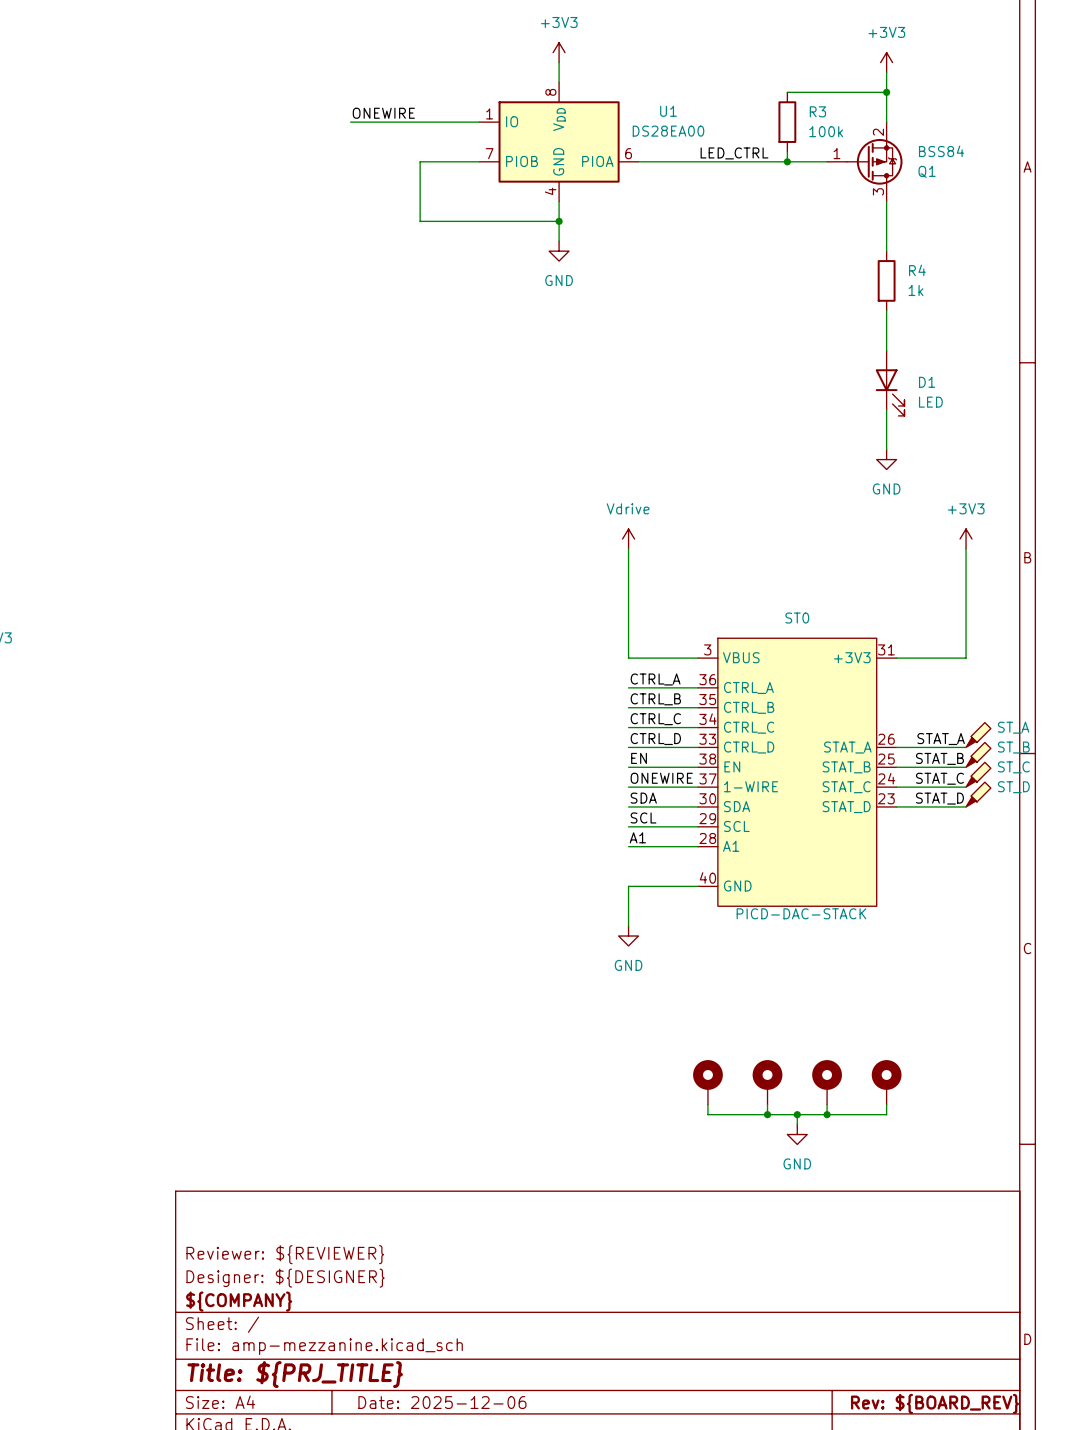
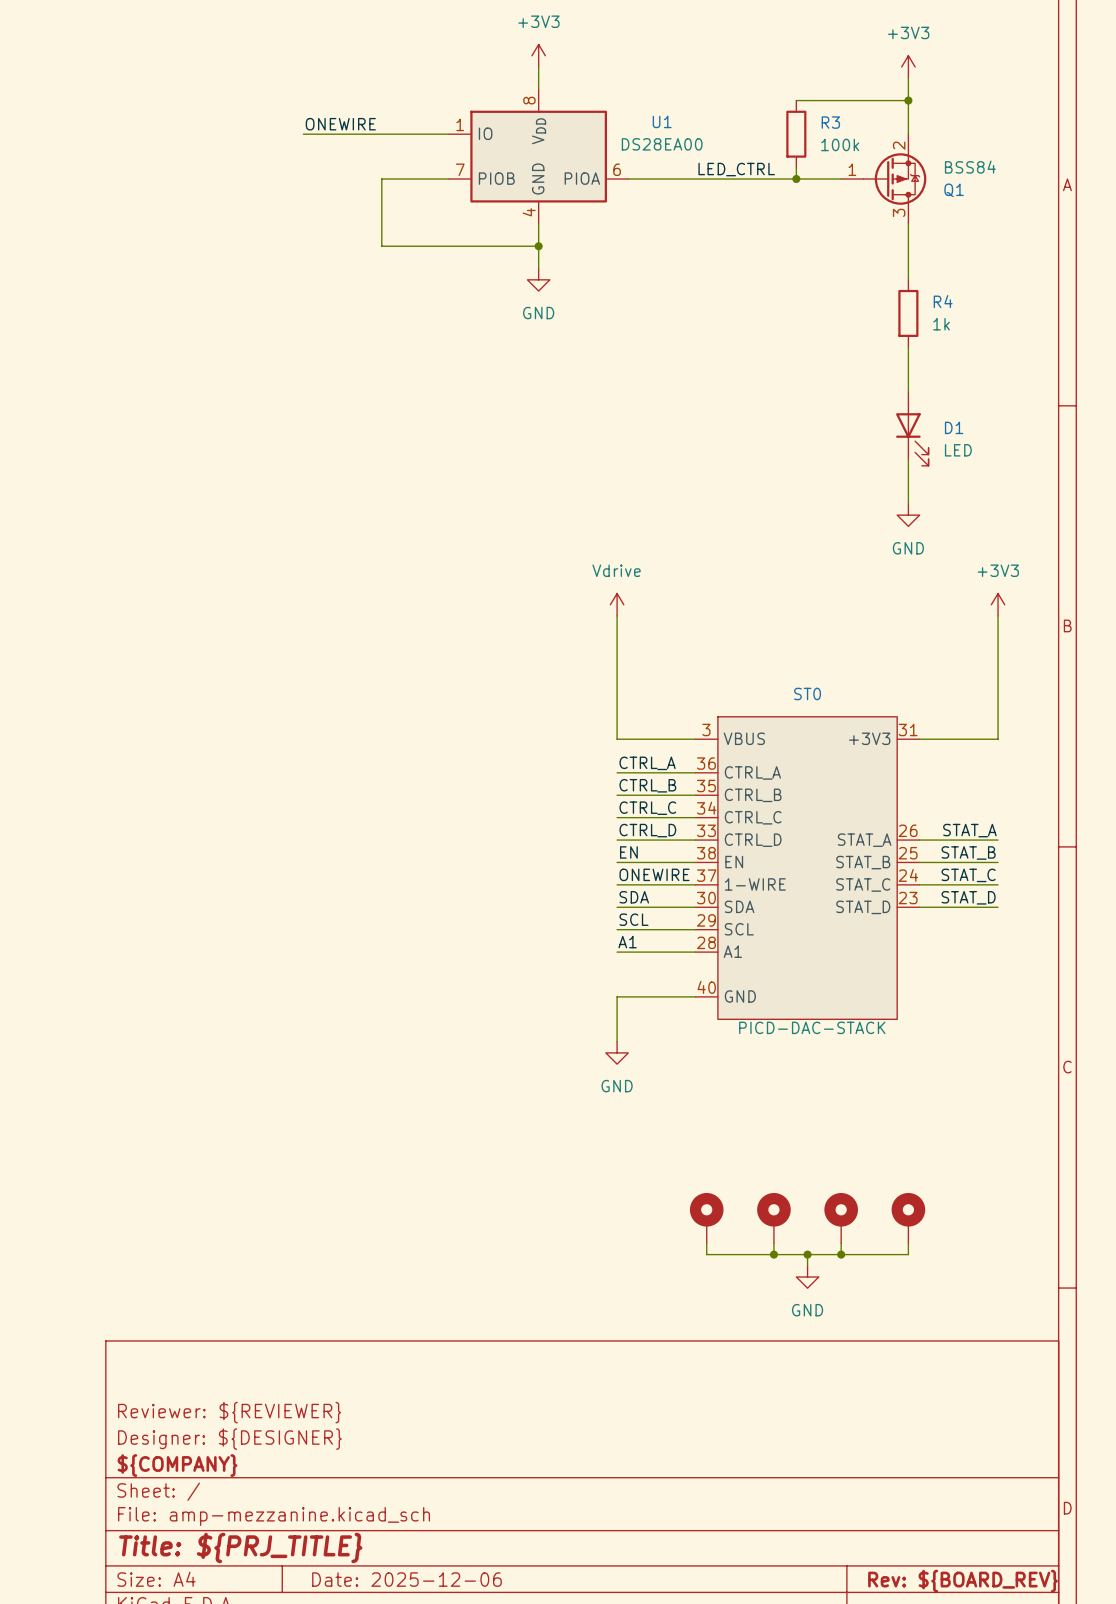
part: ST_A (978, 735) -> none
part: ST_B (978, 754) -> none
part: ST_C (978, 774) -> none
part: ST_D (978, 794) -> none

